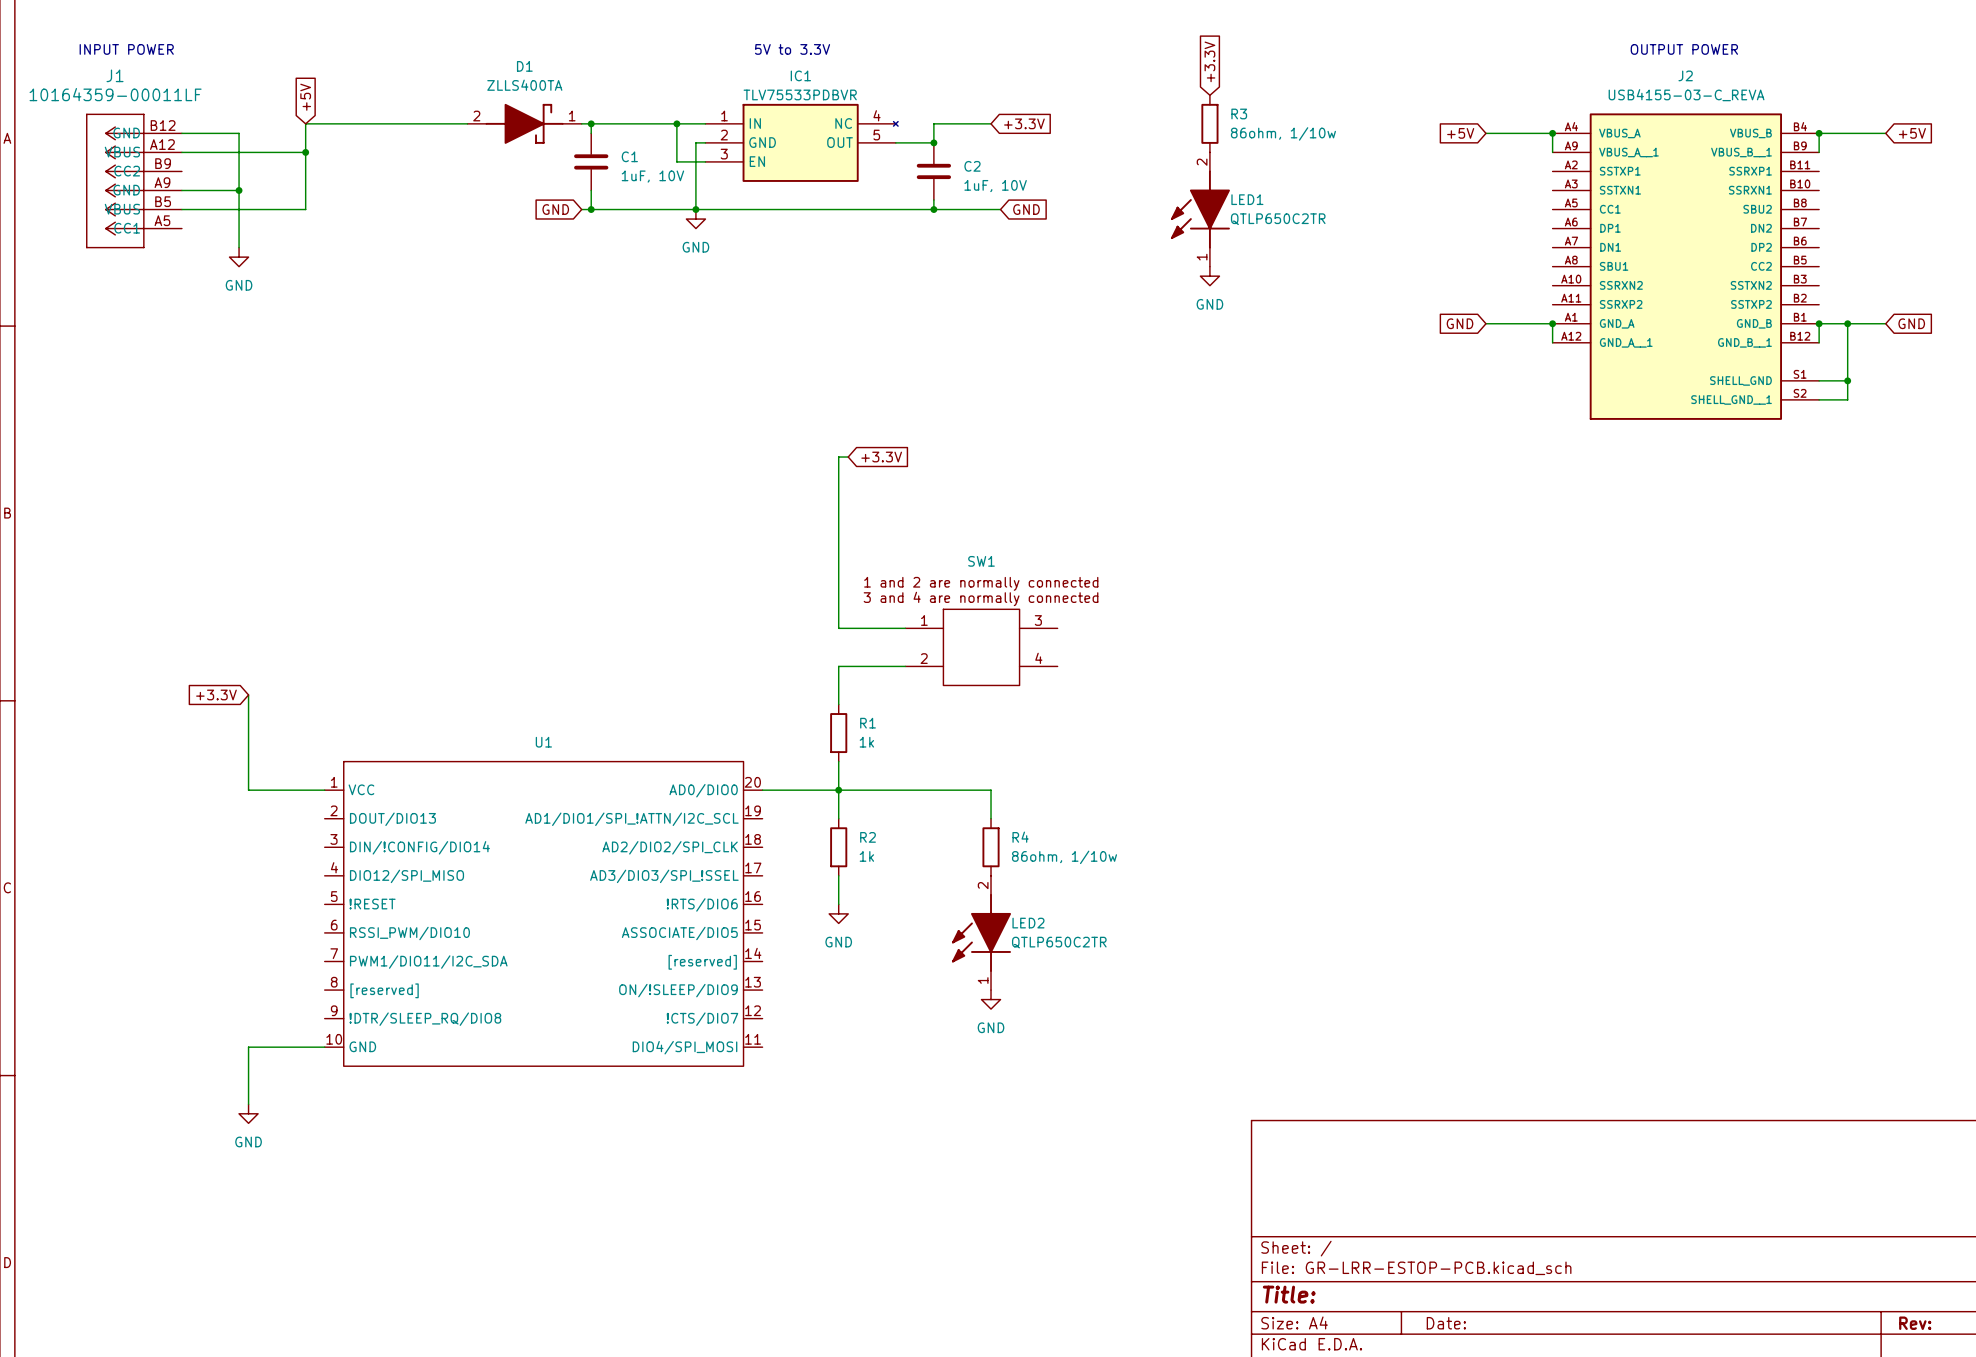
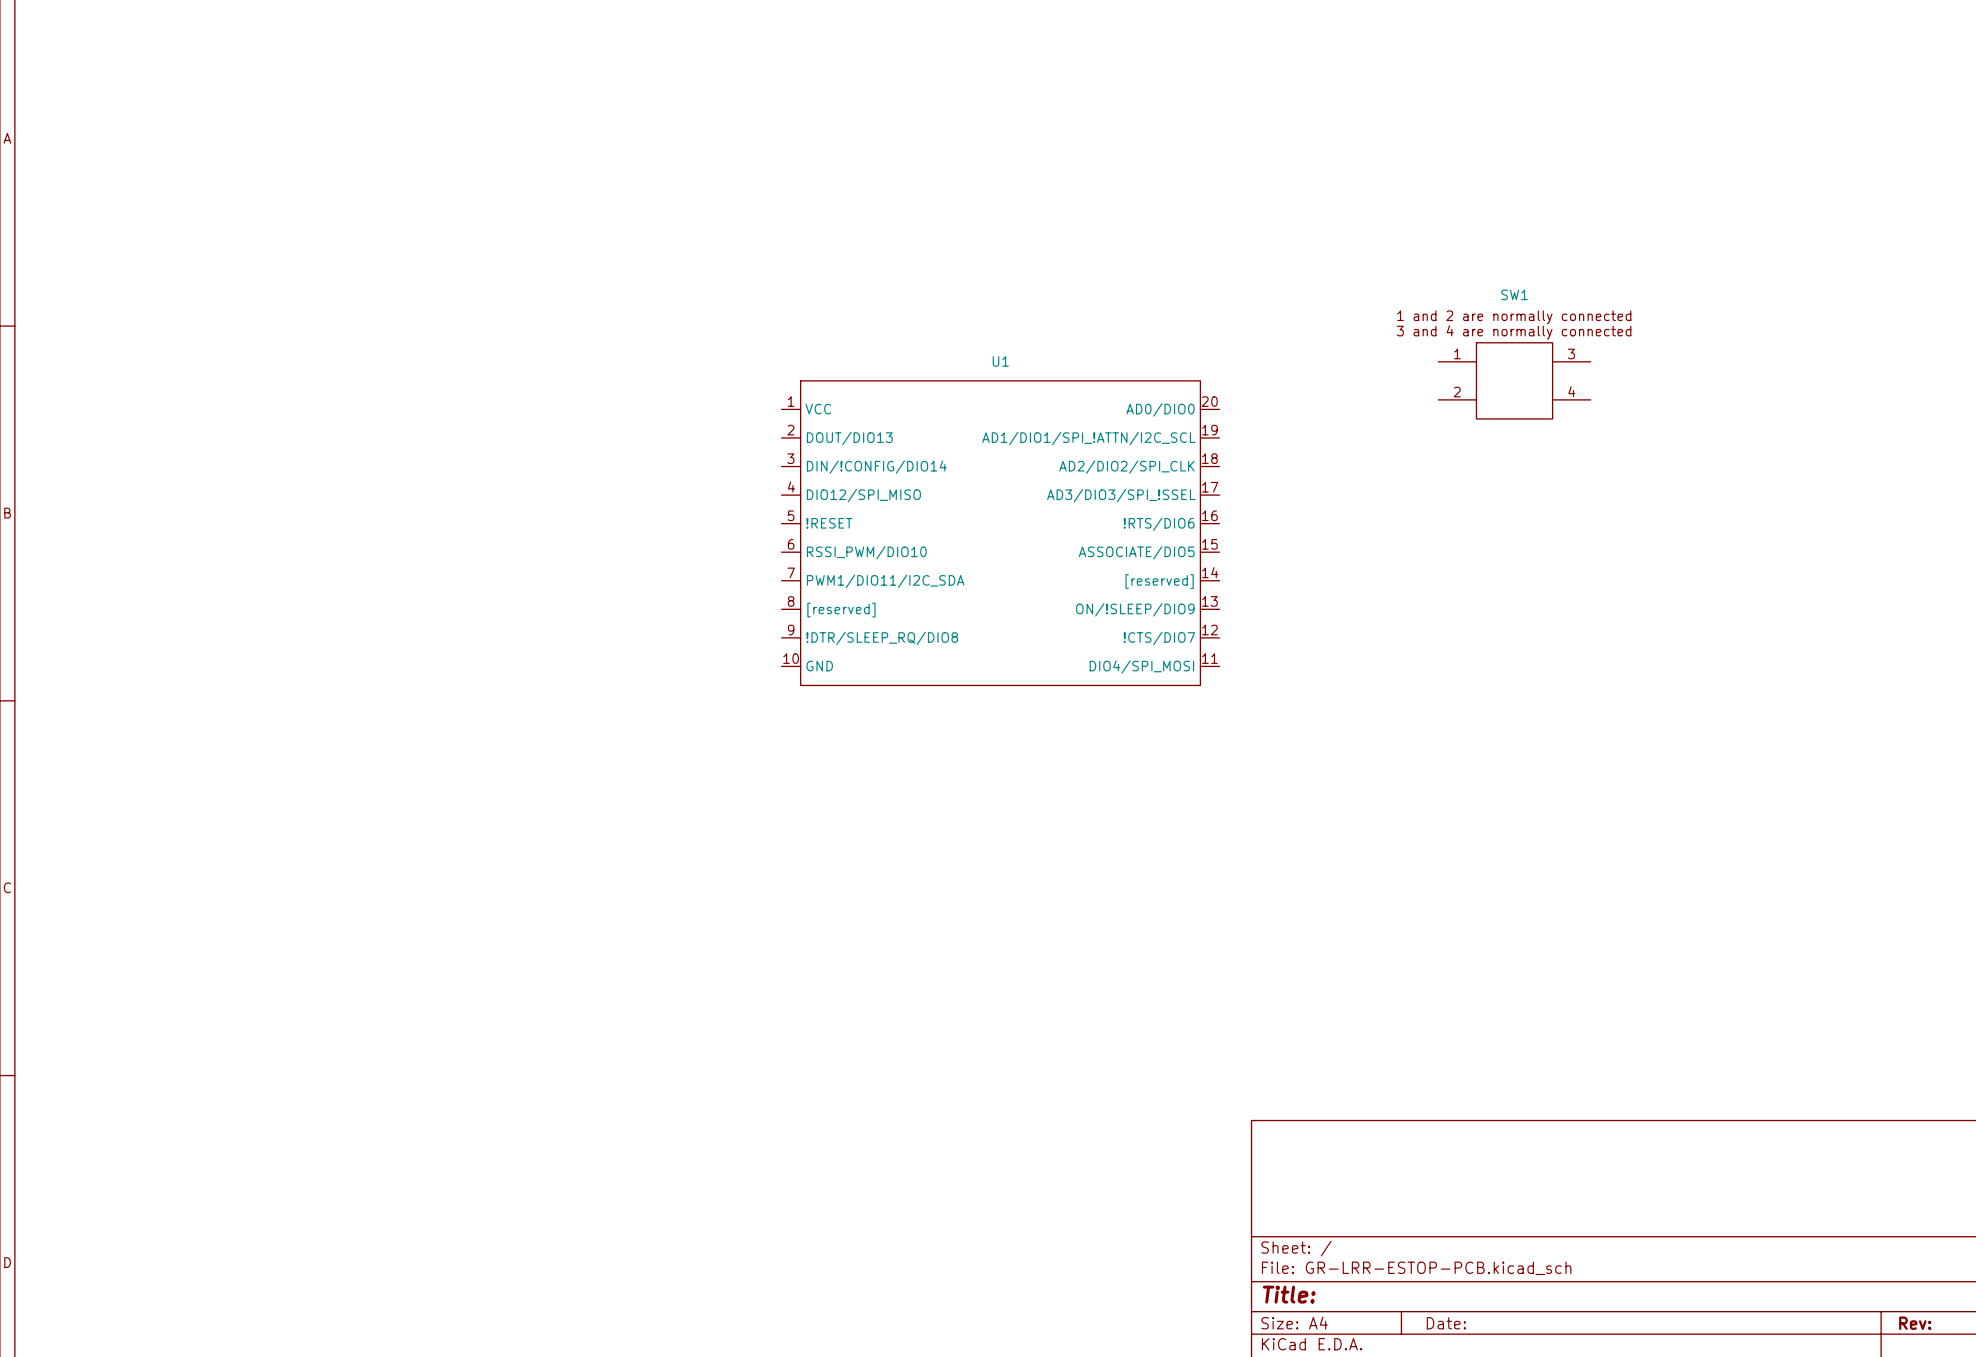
text: INPUT POWER (126, 49) -> none
text: 5V to 3.3V (792, 49) -> none
text: OUTPUT POWER (1684, 49) -> none
global label: +3.3V (1209, 61) -> none
global label: +5V (305, 97) -> none
wire: (467, 123) (305, 123) (305, 209) (181, 209) -> none
D1: ZLLS400TA (524, 123) -> none
wire: (581, 123) (705, 123) -> none
wire: (591, 123) (591, 133) -> none
junction: (591, 123) -> none
wire: (676, 123) (676, 161) (705, 161) -> none
junction: (676, 123) -> none
wire: (991, 123) (933, 123) (933, 142) (895, 142) -> none
global label: +3.3V (1024, 123) -> none
R3: 86ohm, 1/10w (1209, 123) -> none
wire: (181, 133) (239, 133) (239, 247) -> none
global label: +5V (1460, 133) -> none
wire: (1485, 133) (1552, 133) (1552, 152) -> none
junction: (1552, 133) -> none
junction: (1819, 133) -> none
wire: (1885, 133) (1819, 133) (1819, 152) -> none
global label: +5V (1912, 133) -> none
wire: (705, 142) (695, 142) (695, 209) -> none
IC1: TLV75533PDBVR (801, 142) -> none
junction: (933, 142) -> none
wire: (181, 152) (305, 152) -> none
junction: (305, 152) -> none
C1: 1uF, 10V (591, 161) -> none
C2: 1uF, 10V (933, 171) -> none
J1: 10164359-00011LF (134, 180) -> none
wire: (181, 190) (239, 190) -> none
junction: (239, 190) -> none
wire: (591, 190) (591, 209) -> none
wire: (933, 200) (933, 209) -> none
global label: GND (555, 209) -> none
wire: (581, 209) (1000, 209) -> none
junction: (591, 209) -> none
junction: (695, 209) -> none
junction: (933, 209) -> none
global label: GND (1026, 209) -> none
LED1: QTLP650C2TR (1200, 209) -> none
power symbol: GND (695, 219) -> none
power symbol: GND (239, 257) -> none
J2: USB4155-03-C_REVA (1685, 266) -> none
power symbol: GND (1209, 276) -> none
global label: GND (1460, 323) -> none
wire: (1485, 323) (1552, 323) (1552, 342) -> none
junction: (1552, 323) -> none
junction: (1819, 323) -> none
wire: (1847, 323) (1847, 399) (1819, 399) -> none
junction: (1847, 323) -> none
wire: (1885, 323) (1819, 323) (1819, 342) -> none
global label: GND (1911, 323) -> none
wire: (1819, 380) (1847, 380) -> none
junction: (1847, 380) -> none
wire: (848, 457) (838, 457) (838, 628) (905, 628) -> none
global label: +3.3V (881, 457) -> none
SW1 position: (981, 647) -> (1514, 380)
wire: (905, 666) (838, 666) (838, 704) -> none
global label: +3.3V (216, 694) -> none
wire: (248, 694) (248, 790) (324, 790) -> none
R1: 1k (838, 733) -> none
wire: (838, 761) (838, 818) -> none
wire: (762, 790) (991, 790) (991, 818) -> none
junction: (838, 790) -> none
R2: 1k (838, 847) -> none
R4: 86ohm, 1/10w (991, 847) -> none
wire: (838, 875) (838, 904) -> none
U1 position: (543, 913) -> (1000, 533)
power symbol: GND (838, 913) -> none
LED2: QTLP650C2TR (981, 932) -> none
power symbol: GND (991, 999) -> none
wire: (324, 1047) (248, 1047) (248, 1104) -> none
power symbol: GND (248, 1113) -> none

